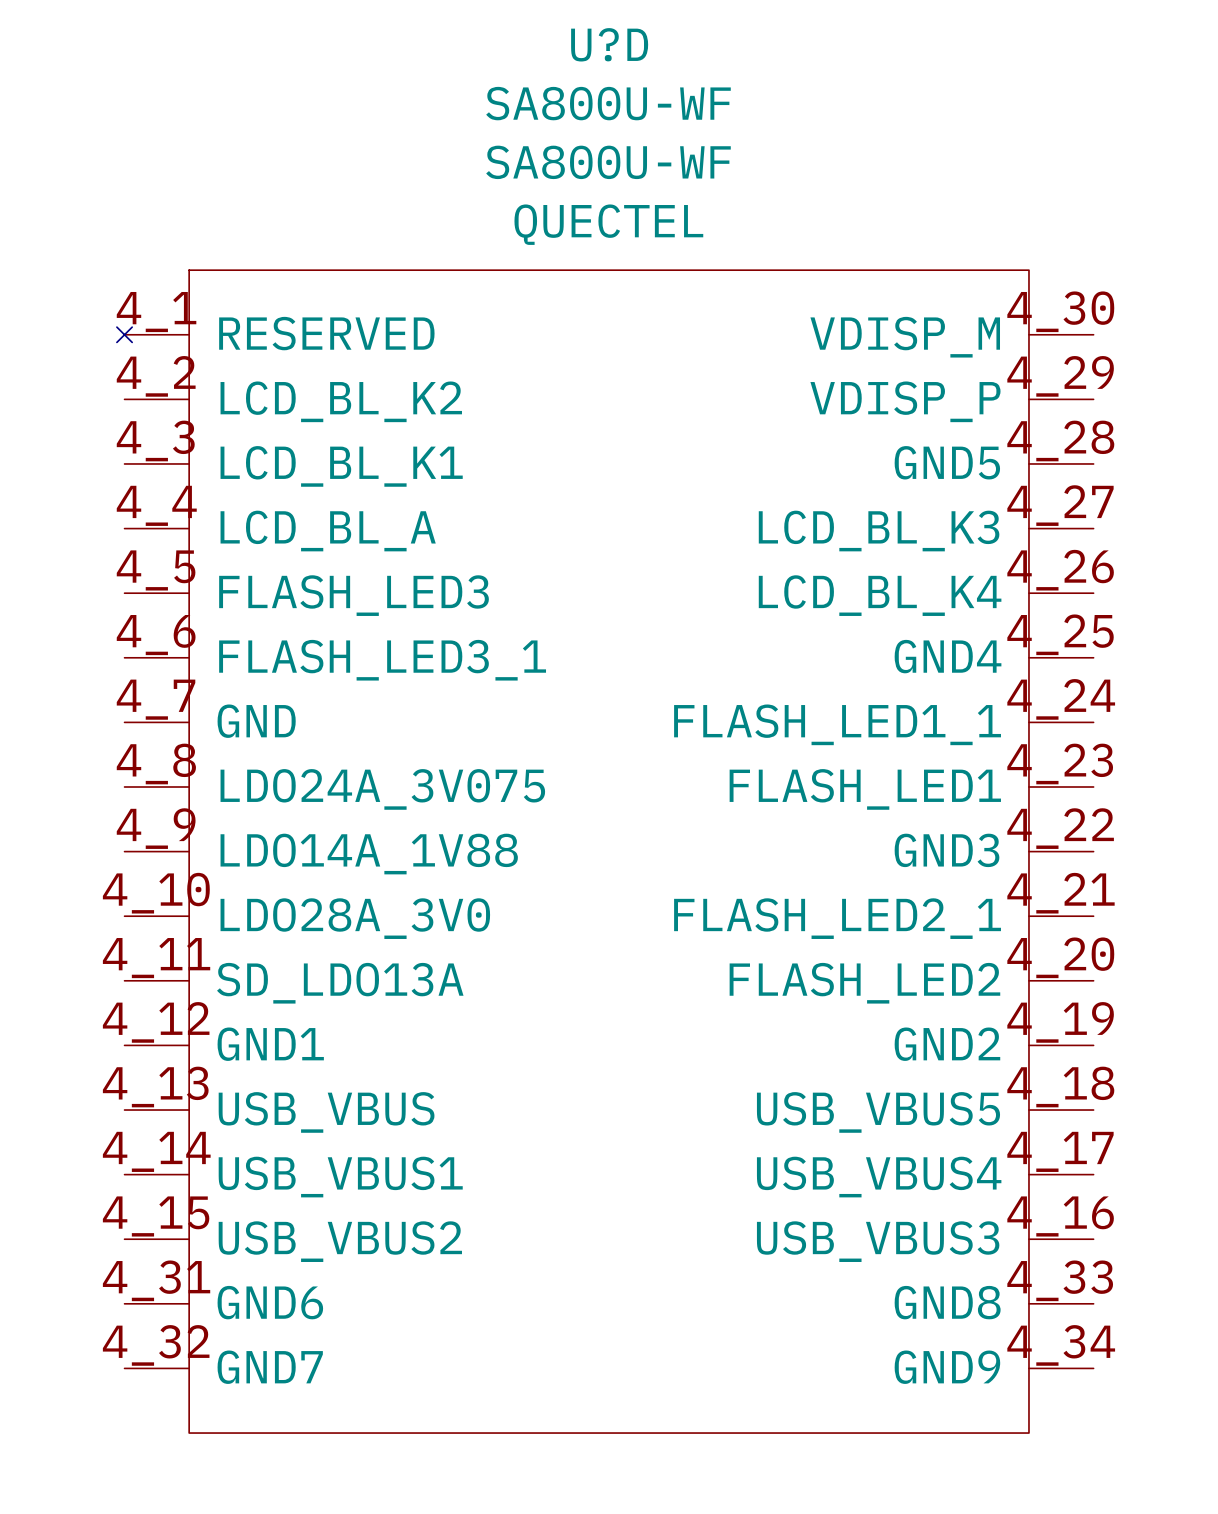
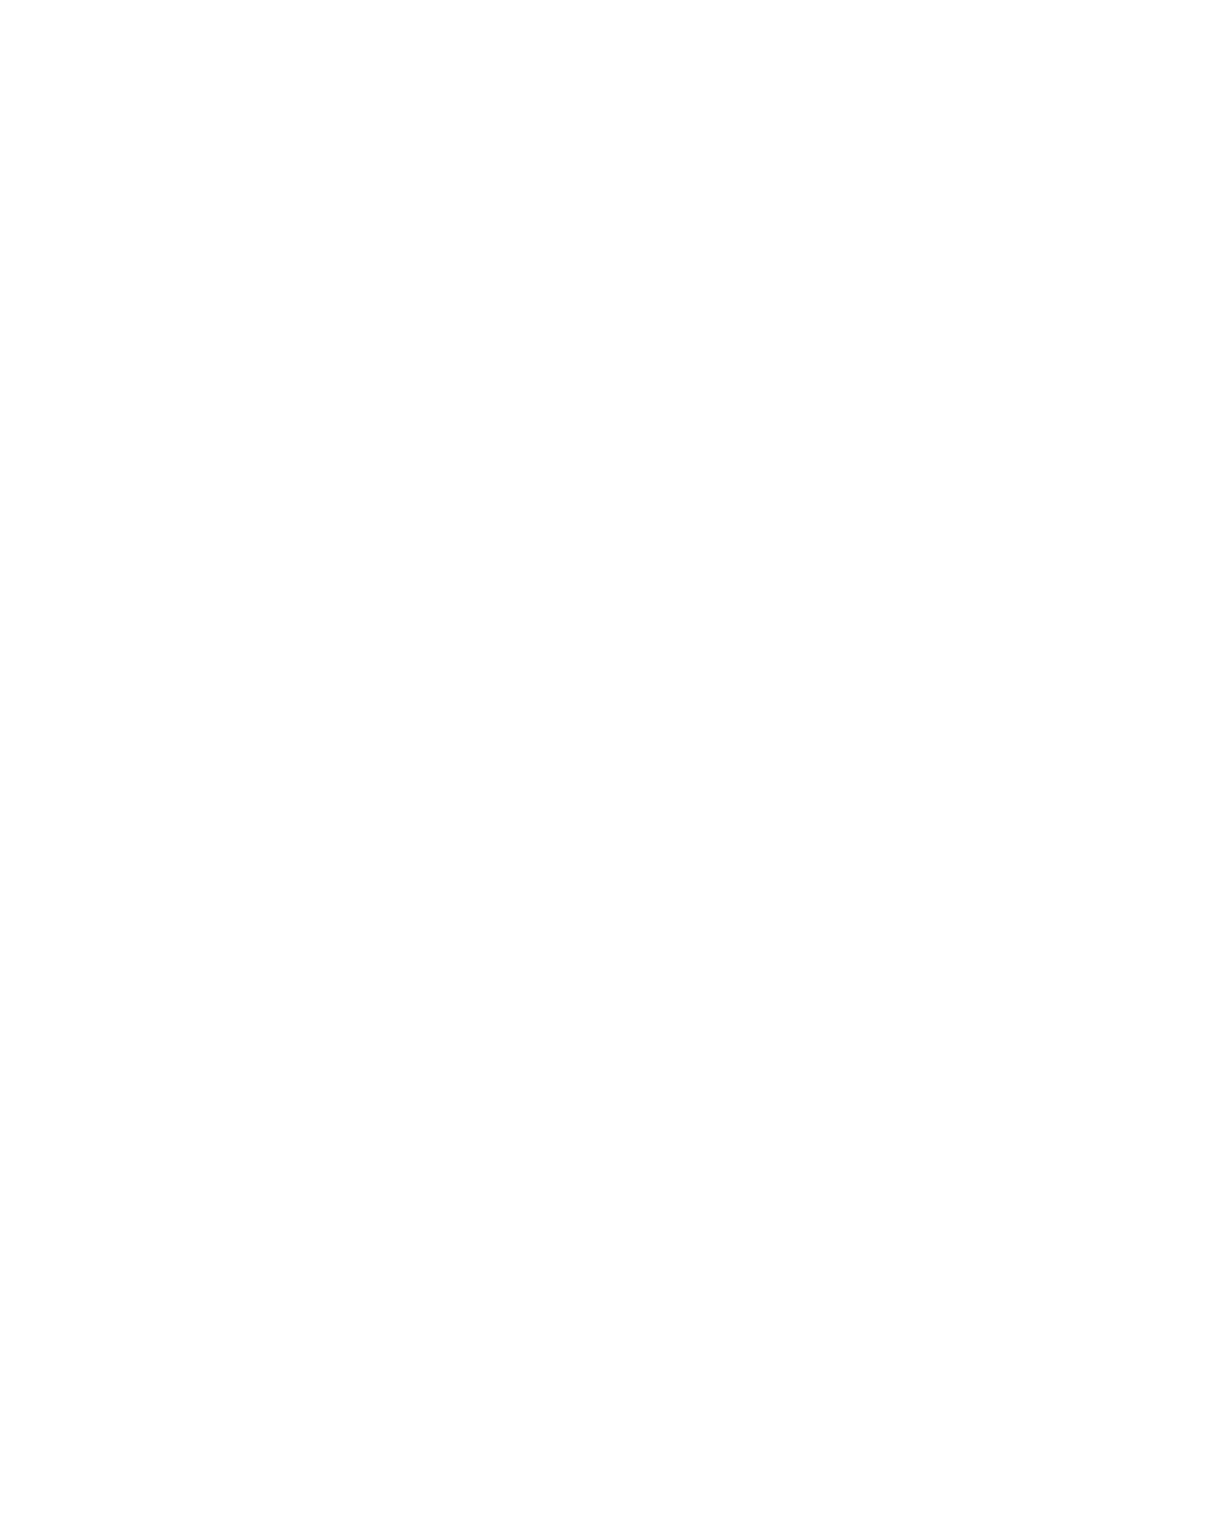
U?D: SA800U-WF (605, 851) -> none

